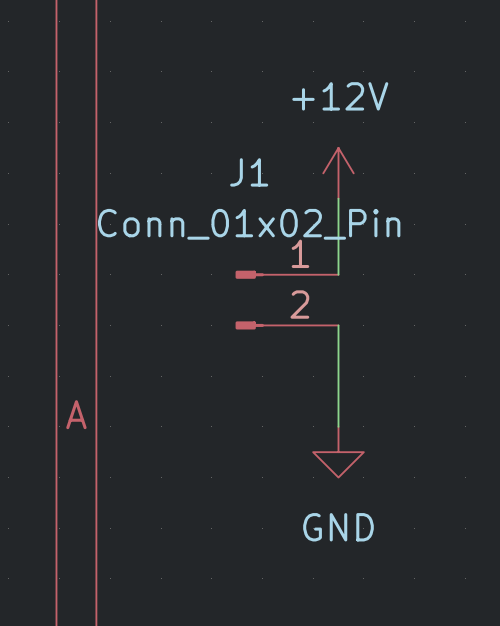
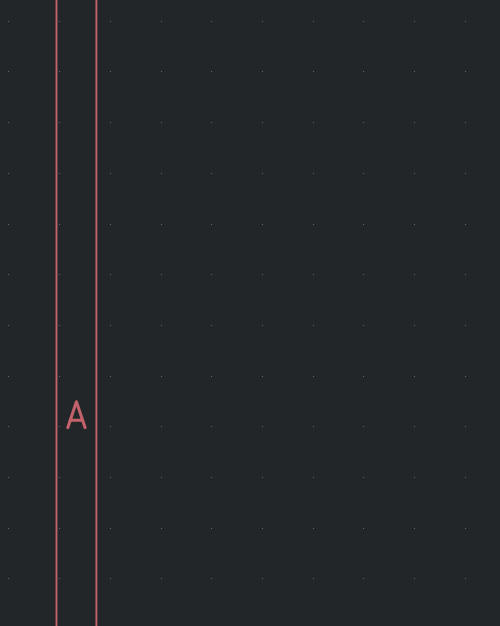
power symbol: +12V (338, 173) -> none
wire: (338, 198) (338, 274) -> none
J1: Conn_01x02_Pin (287, 300) -> none
wire: (338, 325) (338, 426) -> none
power symbol: GND (338, 452) -> none

